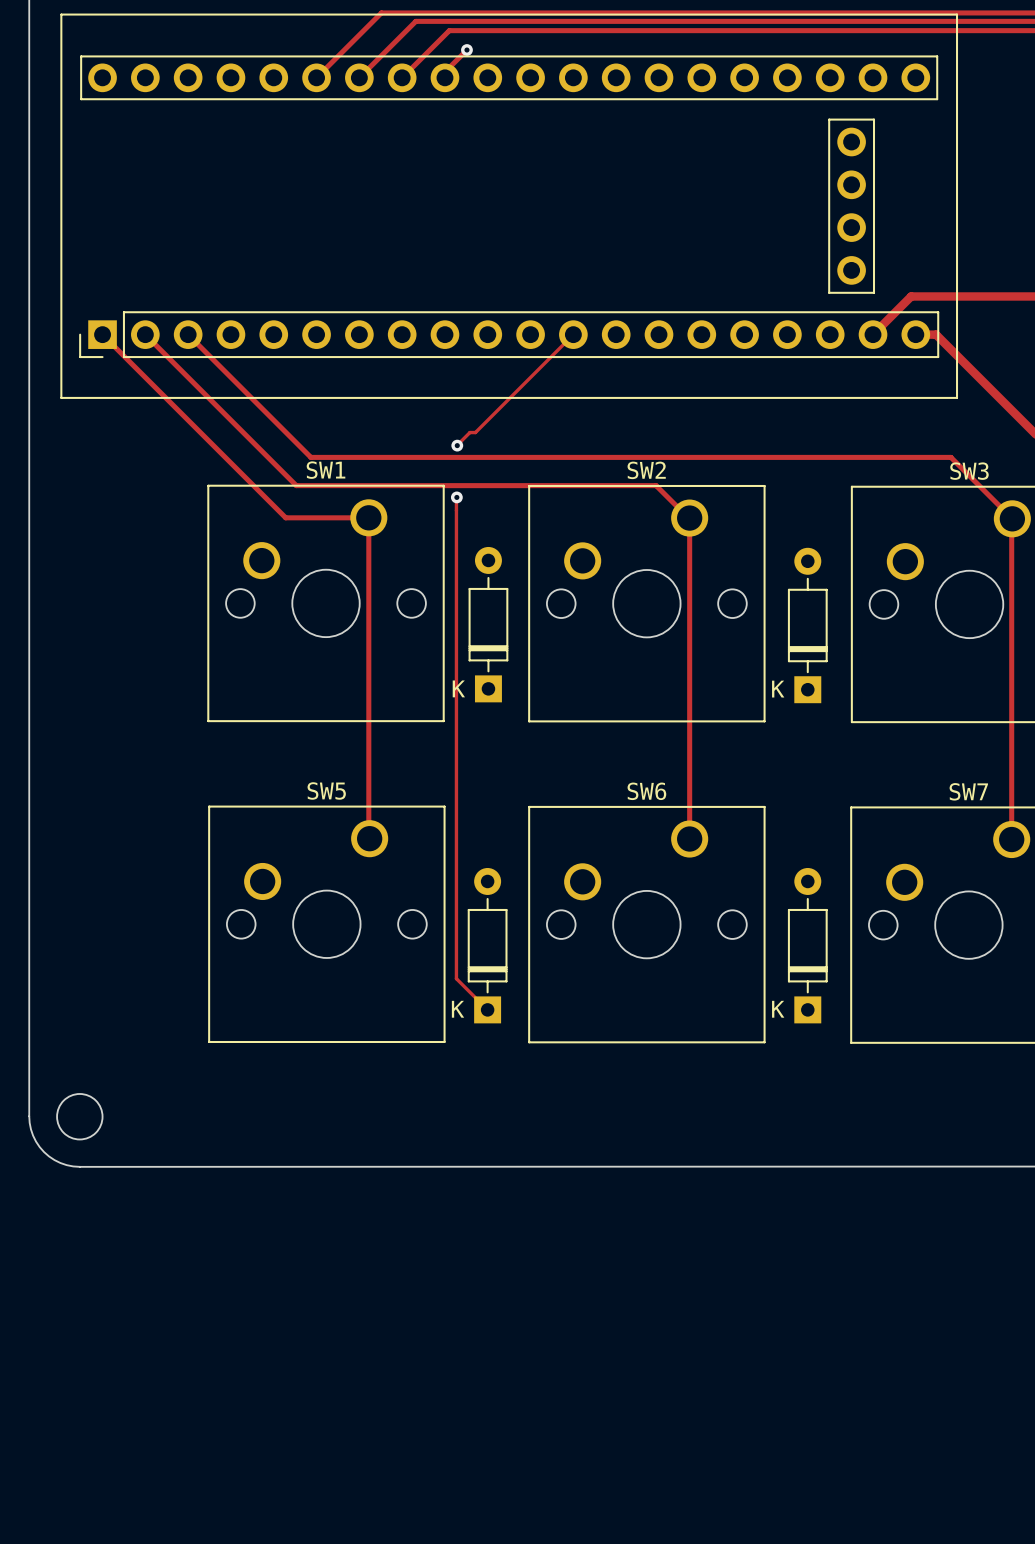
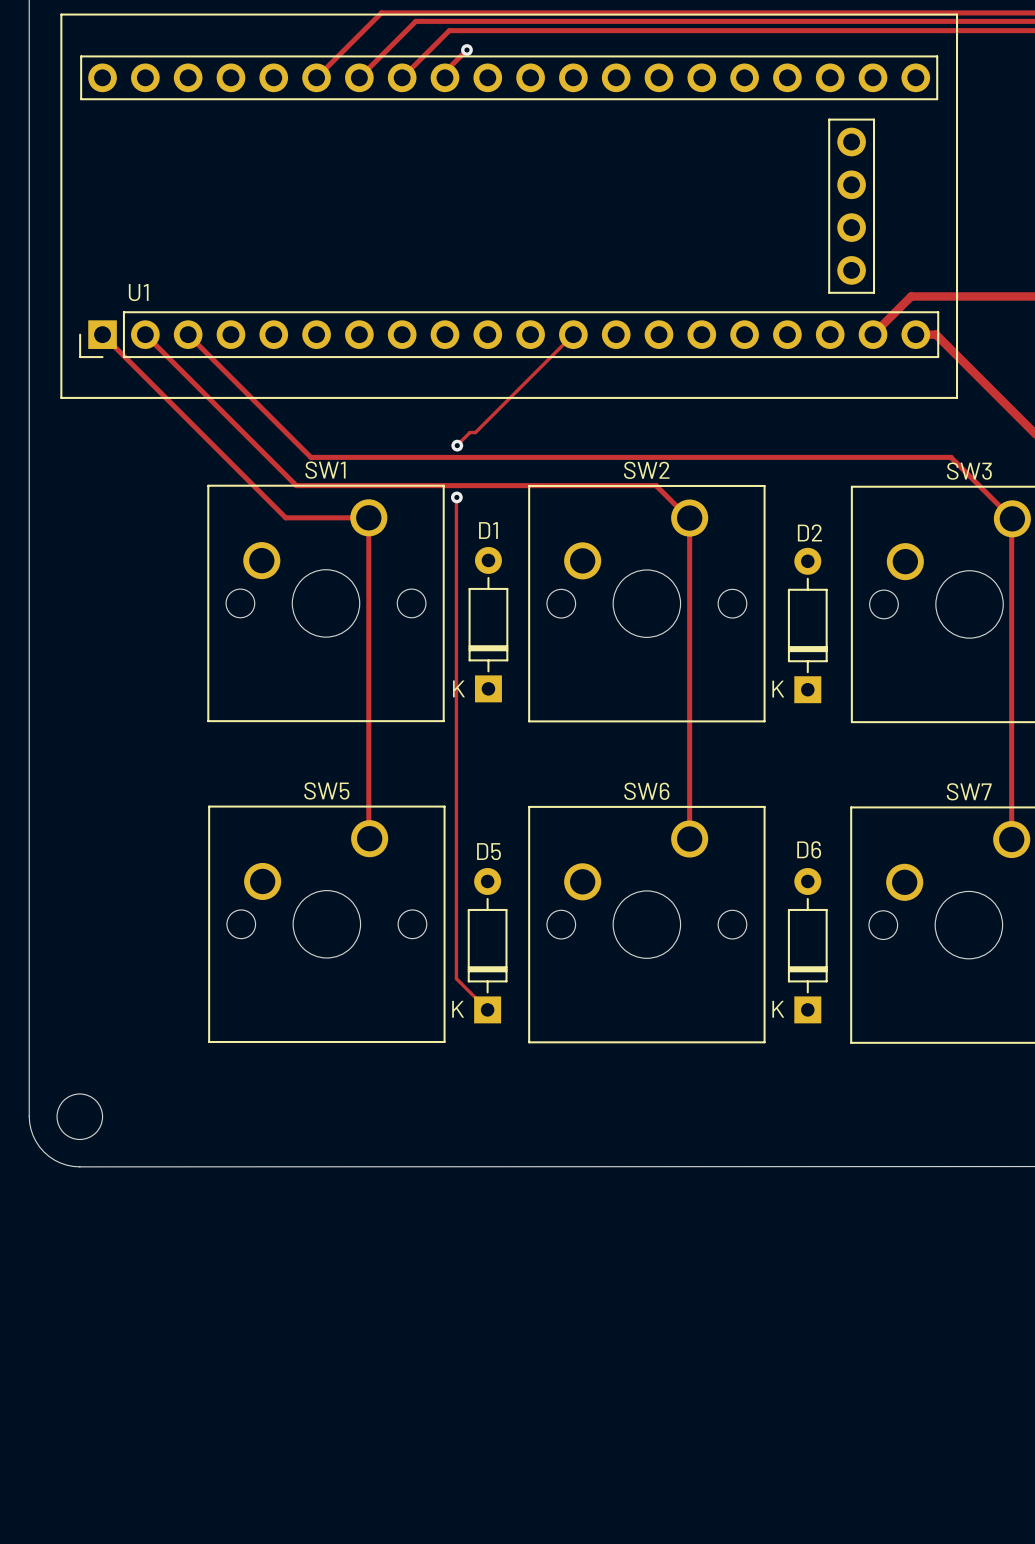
U1 name: none -> U1 (138, 292)
D1 name: none -> D1 (488, 530)
D2 name: none -> D2 (809, 532)
D6 name: none -> D6 (809, 849)
D5 name: none -> D5 (488, 851)

